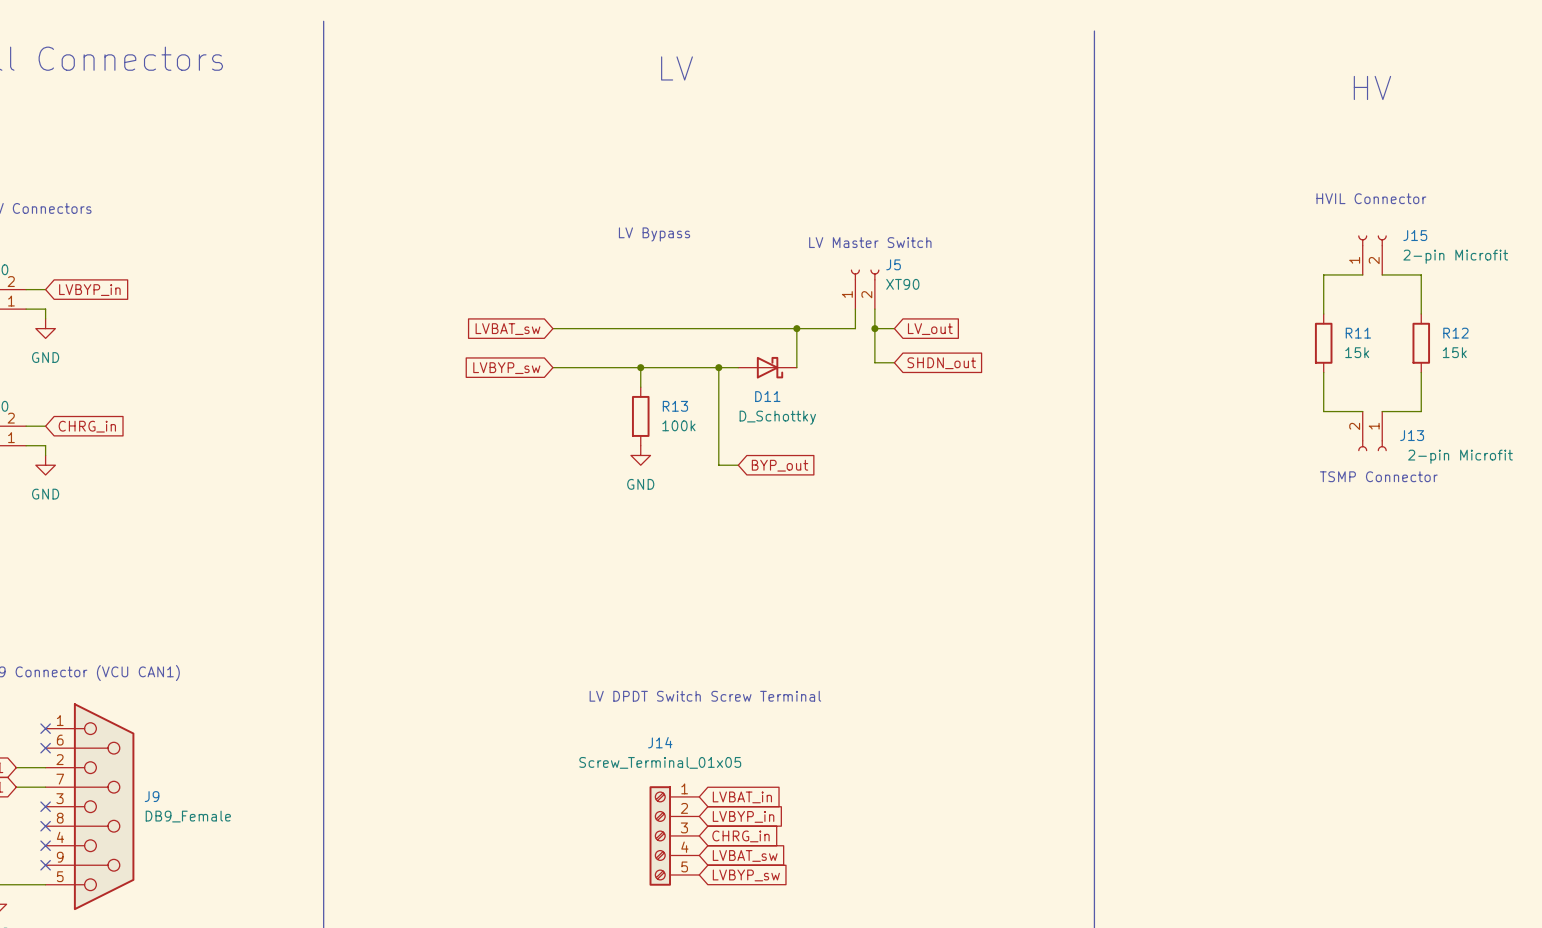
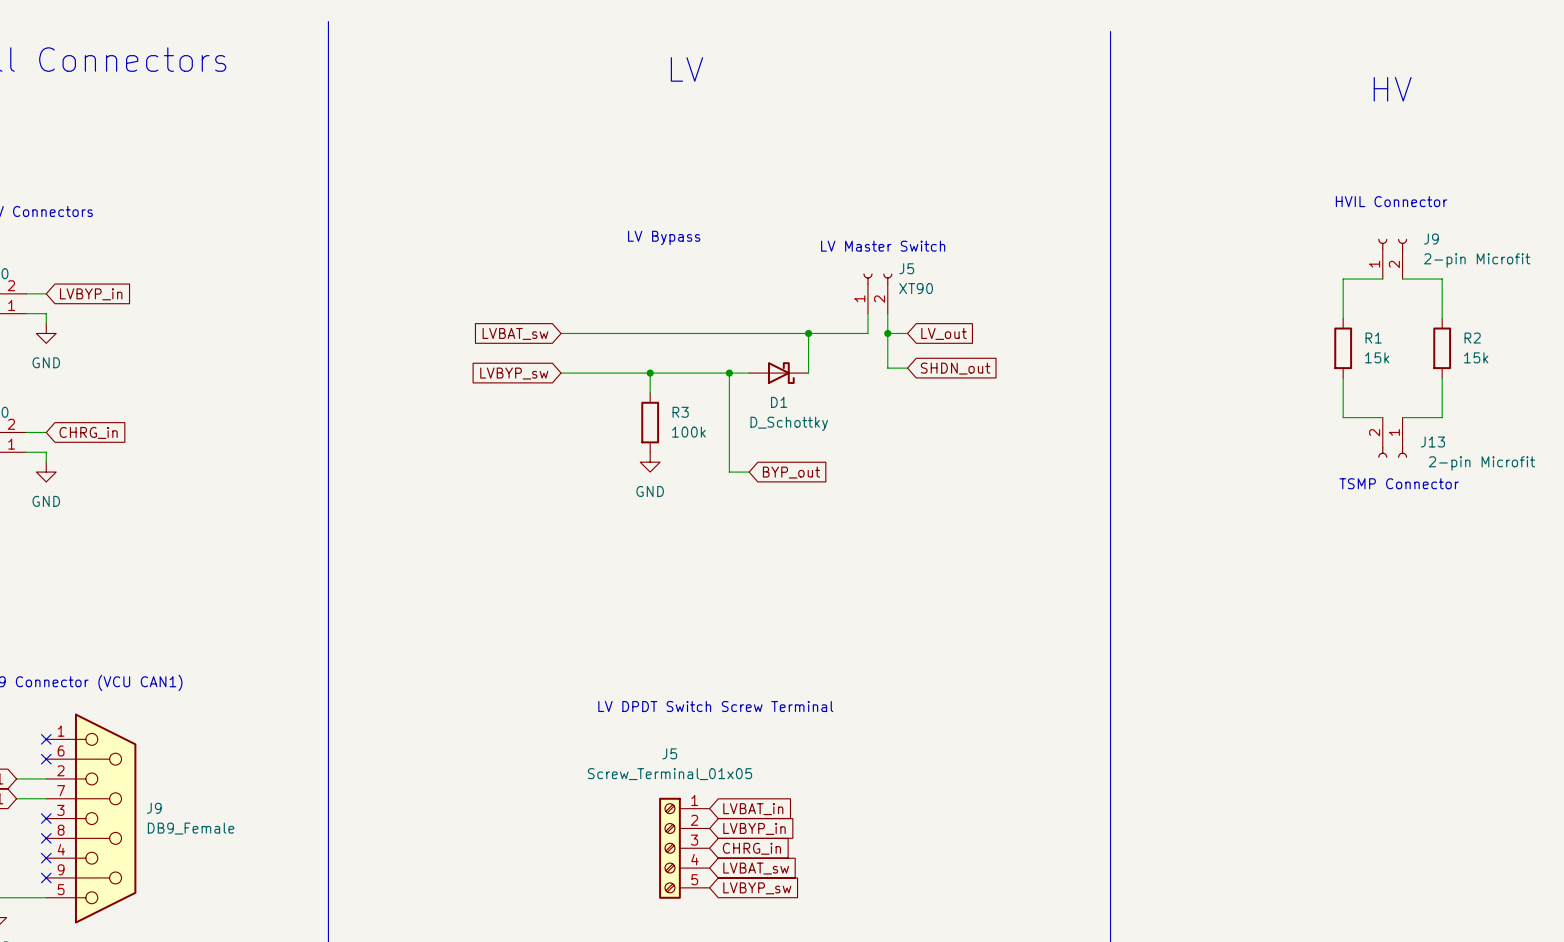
J15 name: J15 (1415, 235) -> J9 (1431, 239)
R11 name: R11 (1358, 333) -> R1 (1373, 338)
R12 name: R12 (1455, 333) -> R2 (1472, 338)
D11 name: D11 (767, 396) -> D1 (779, 402)
R13 name: R13 (675, 406) -> R3 (680, 412)
J14 name: J14 (660, 742) -> J5 (669, 753)

